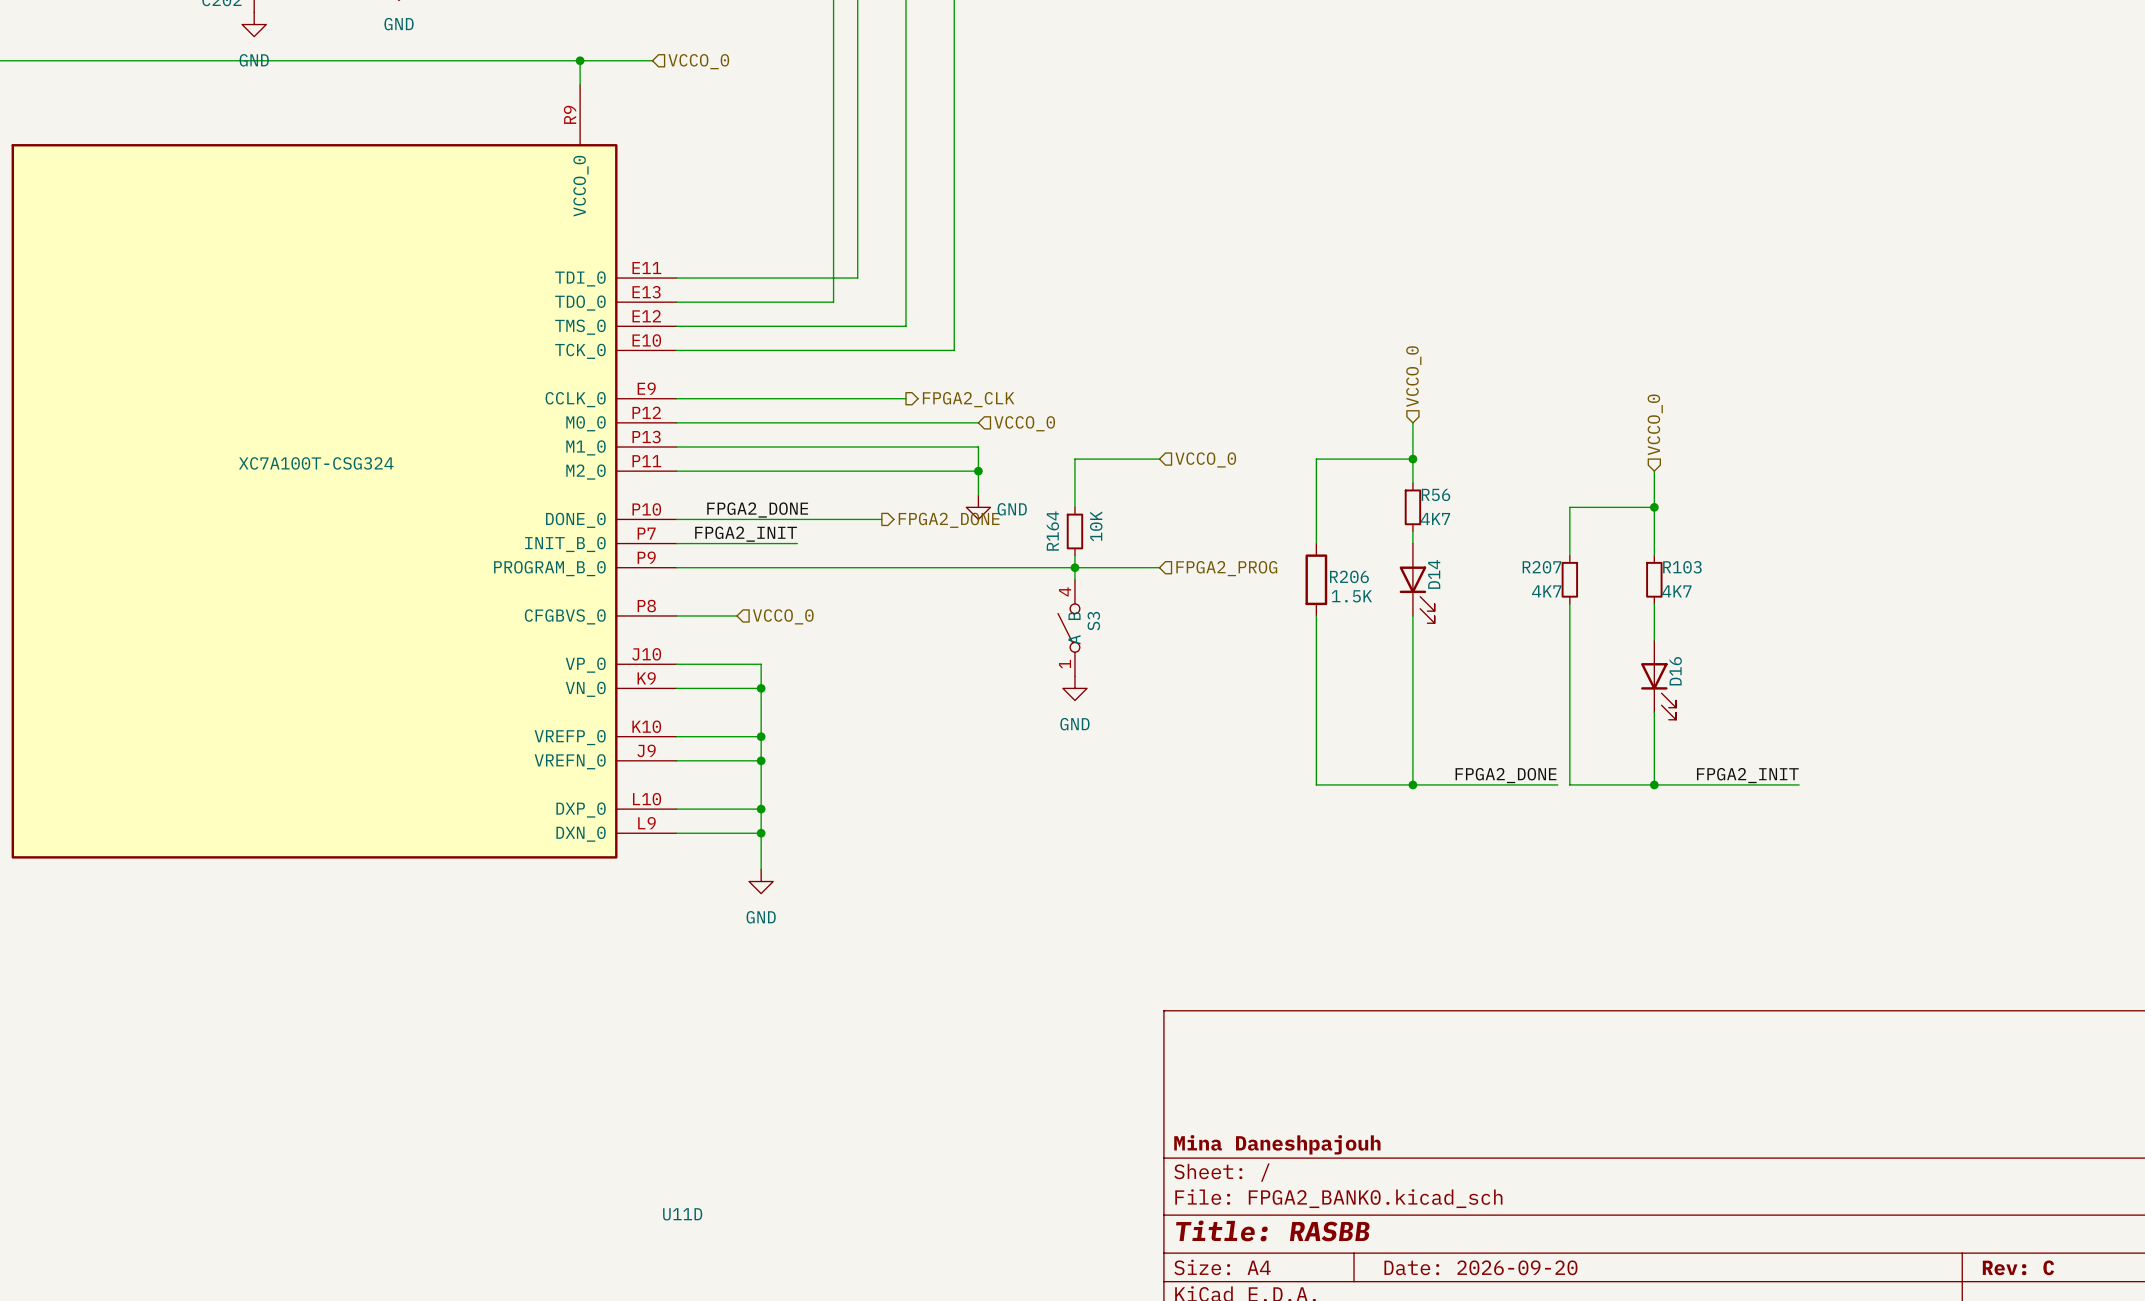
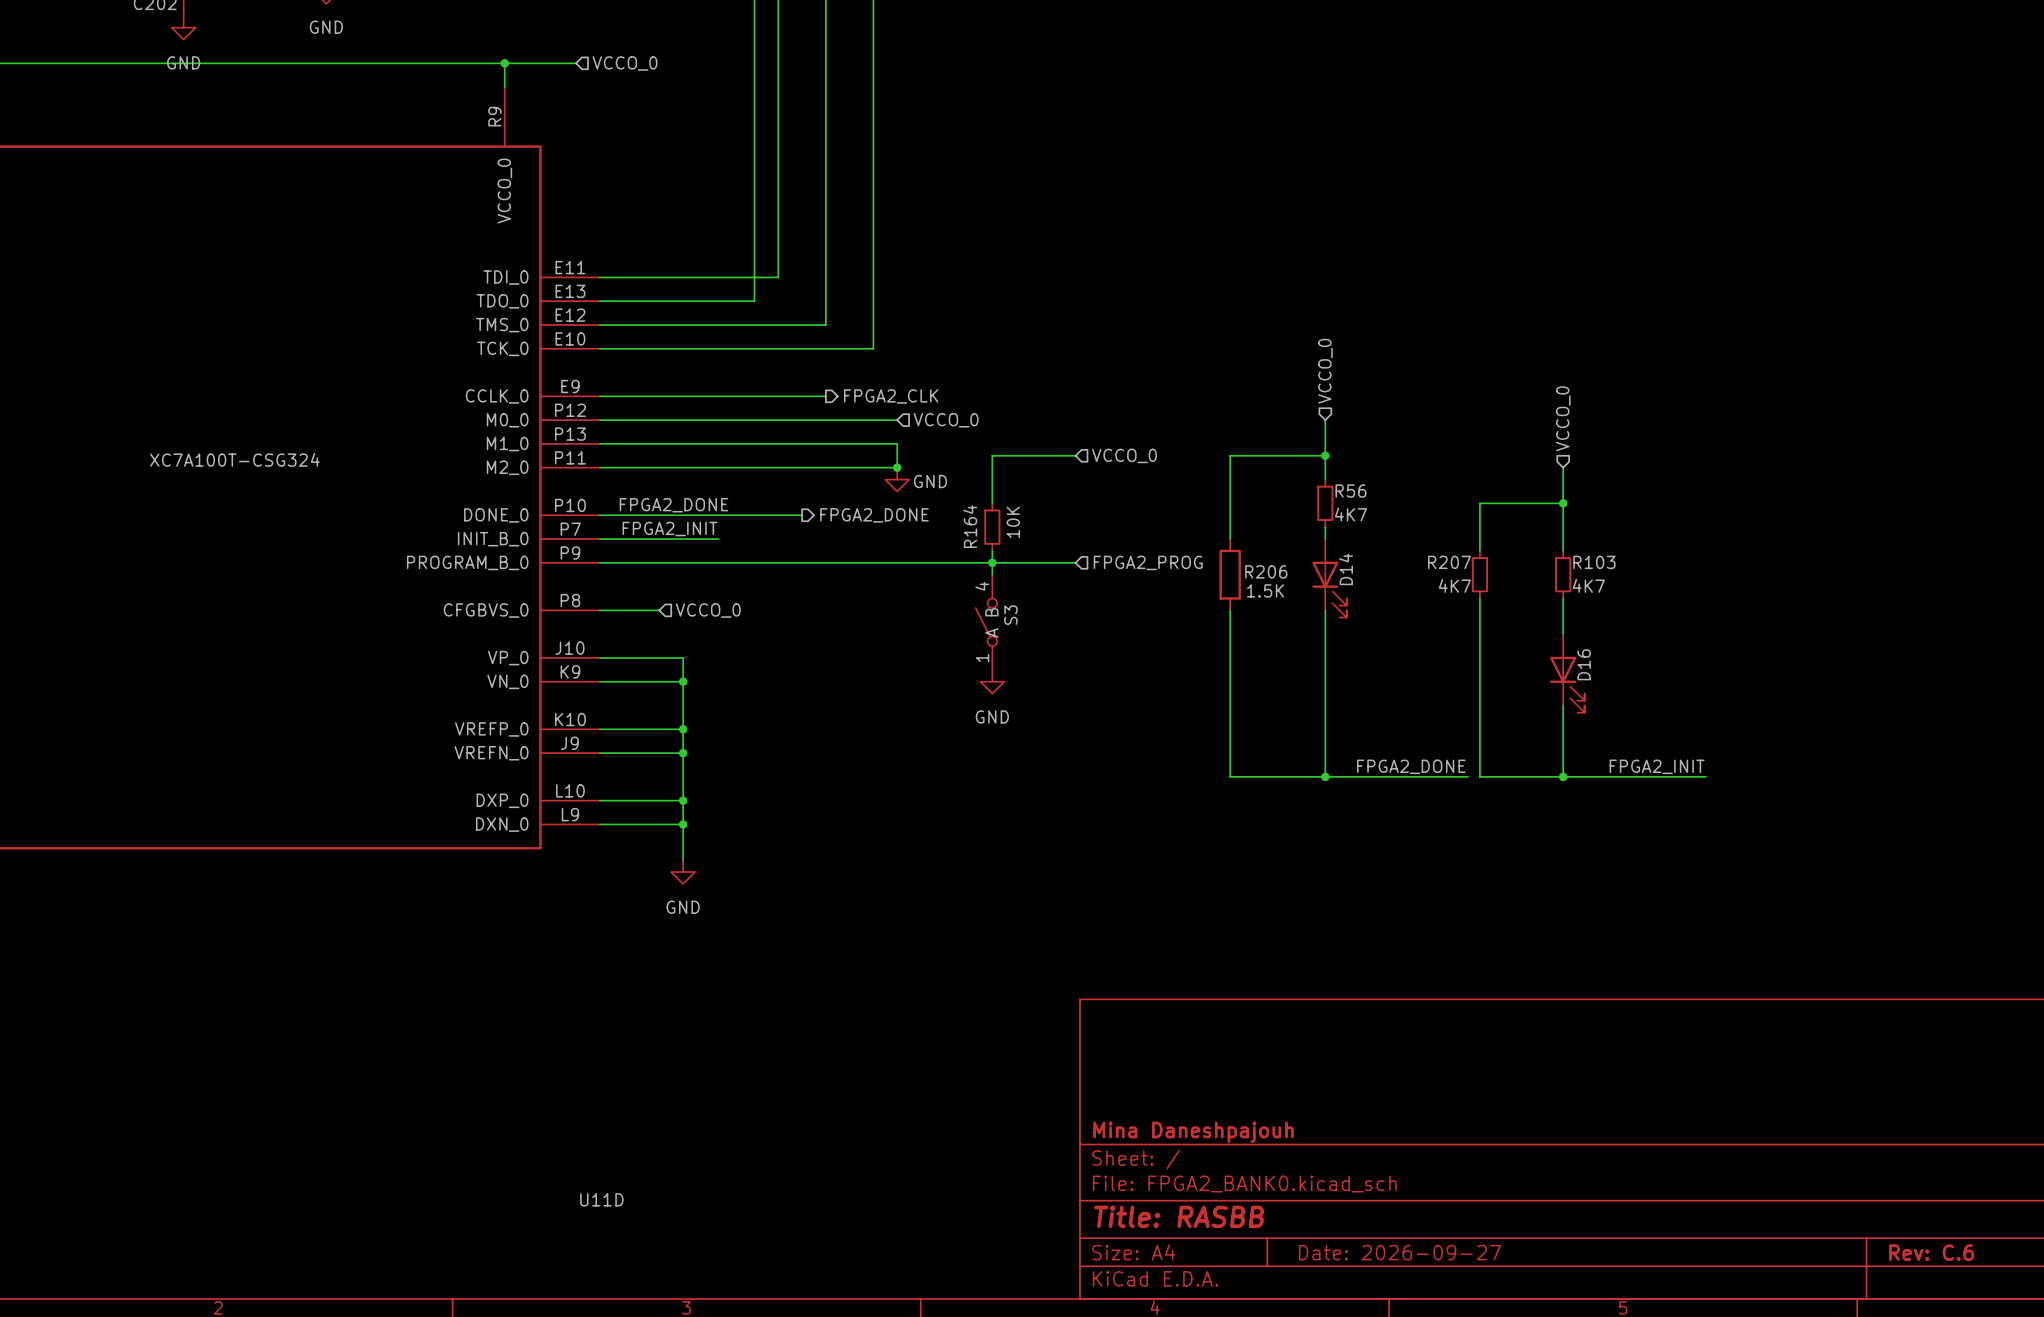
power symbol position: GND (978, 507) -> GND (897, 479)
title block: Date: 2026-09-20 (1480, 1267) -> Date: 2026-09-27 (1399, 1252)
title block: Rev: C (2018, 1267) -> Rev: C.6 (1931, 1252)

